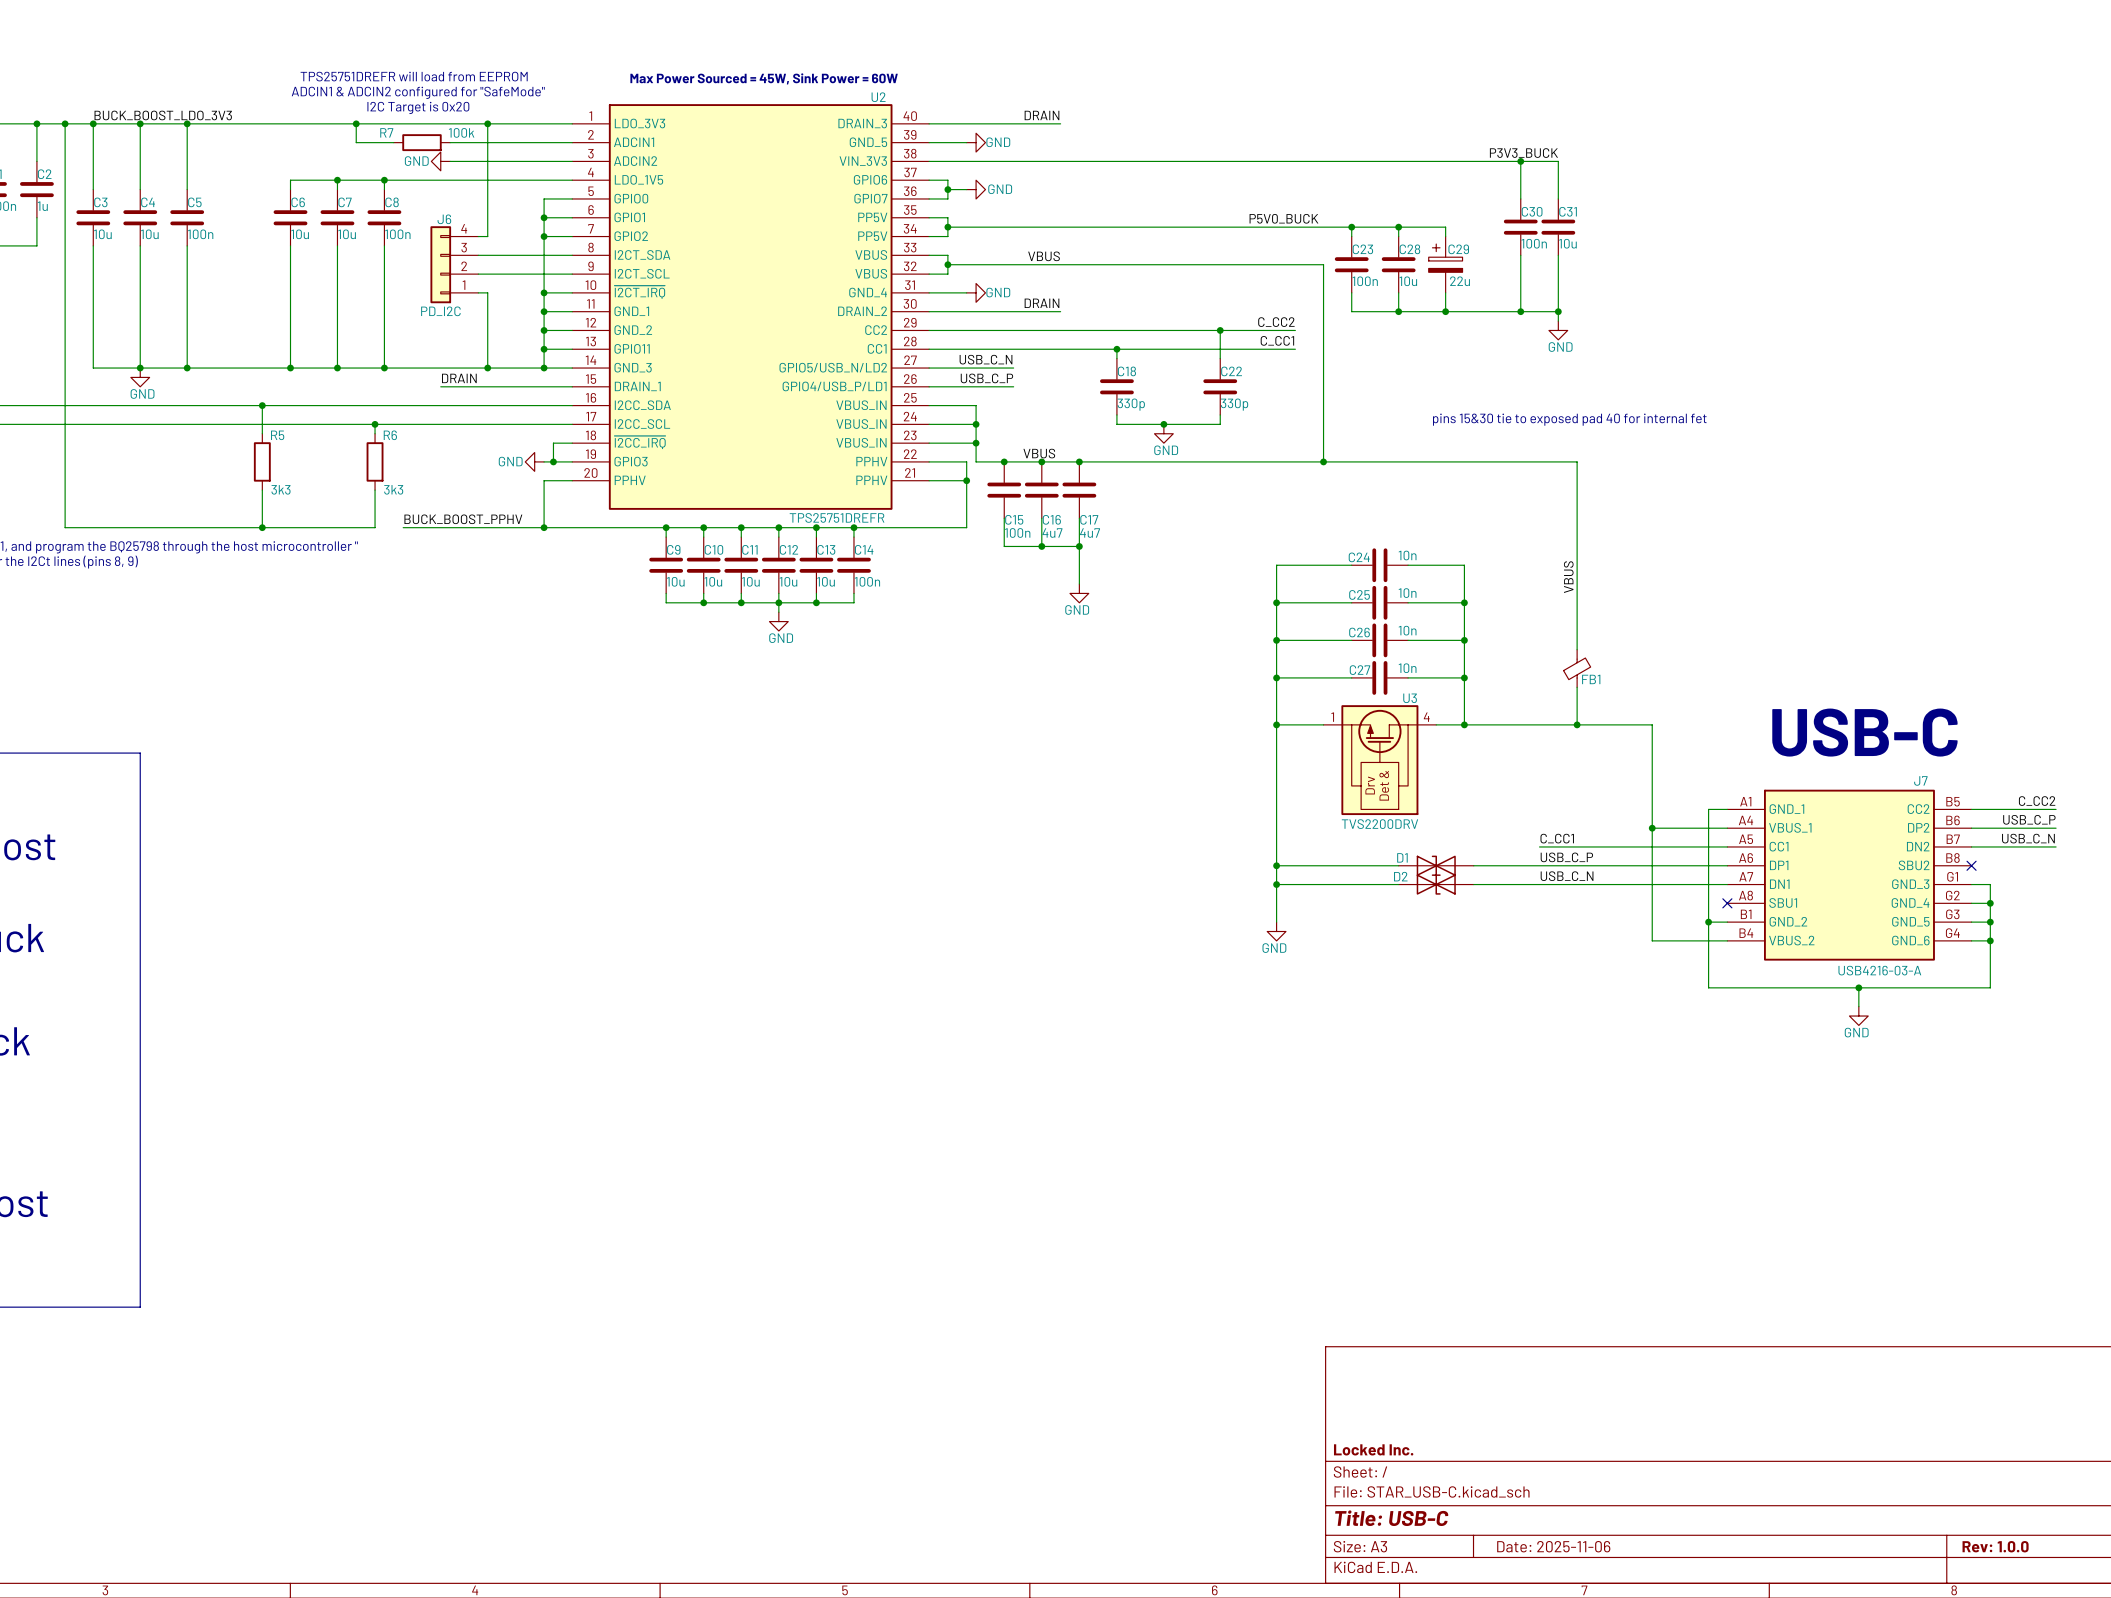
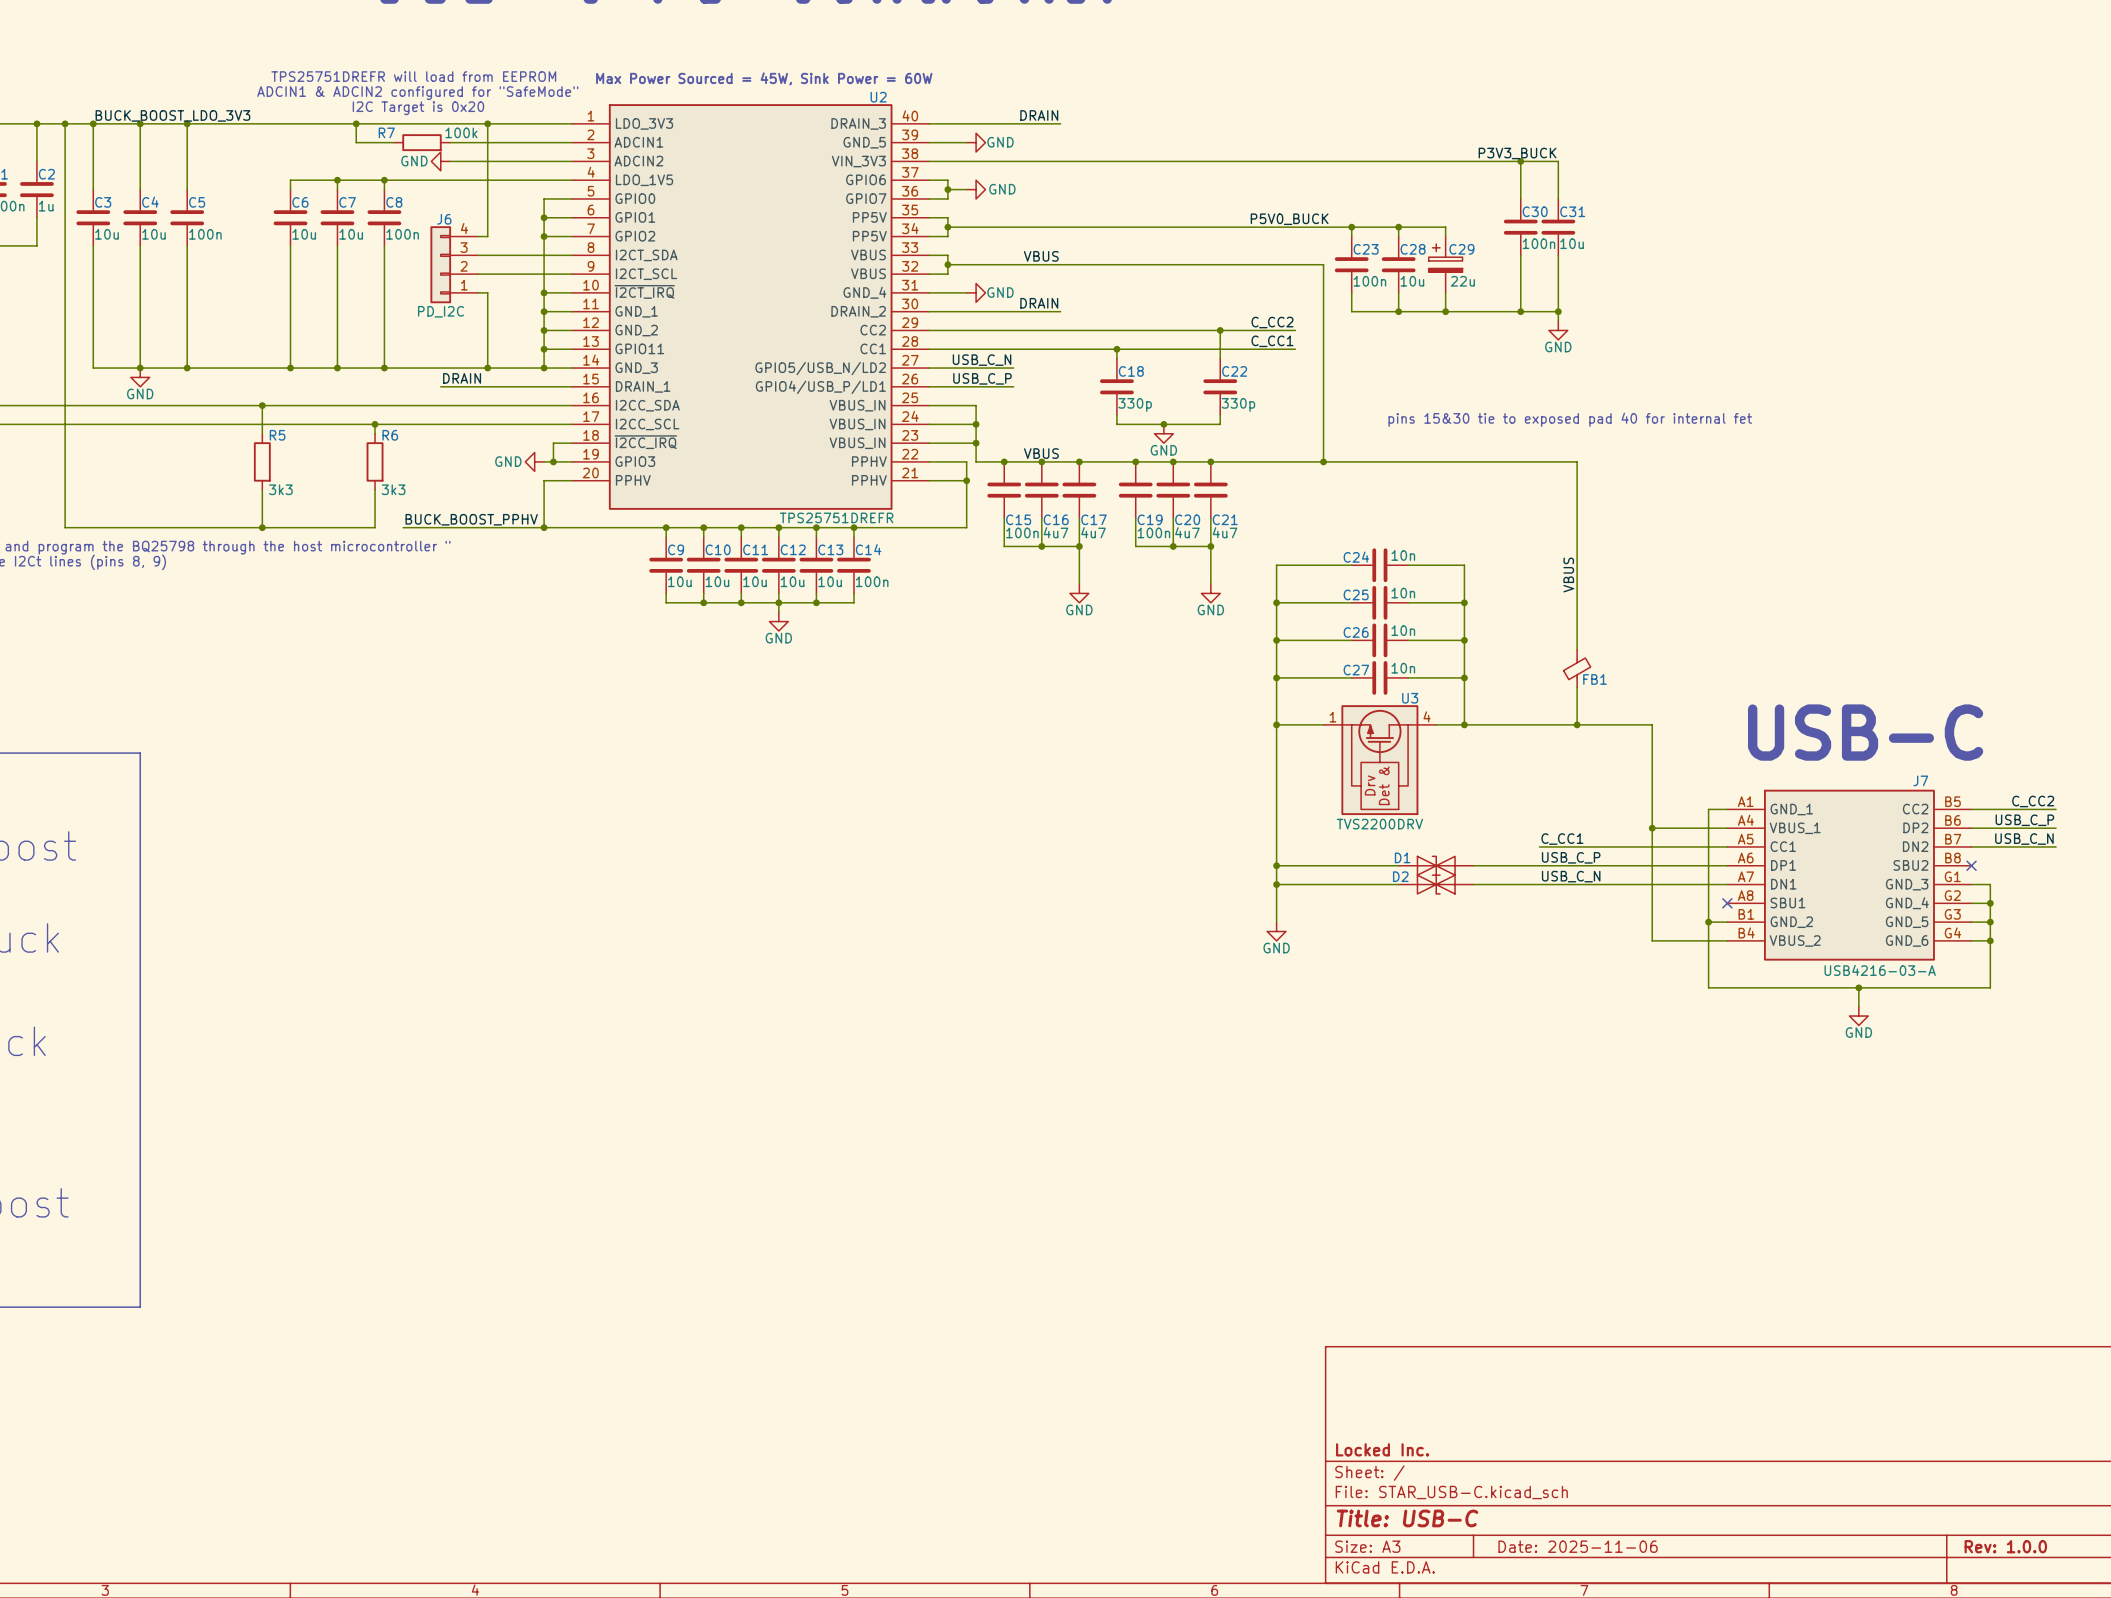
junction: none -> (1135, 461)
junction: none -> (1173, 461)
junction: none -> (1210, 461)
C19: none -> 100n (1135, 490)
C20: none -> 4u7 (1173, 490)
C21: none -> 4u7 (1210, 490)
wire: none -> (1135, 518) (1135, 546) (1210, 546)
wire: none -> (1173, 518) (1173, 546)
wire: none -> (1210, 518) (1210, 584)
junction: none -> (1173, 546)
junction: none -> (1210, 546)
power symbol: none -> GND (1210, 593)

